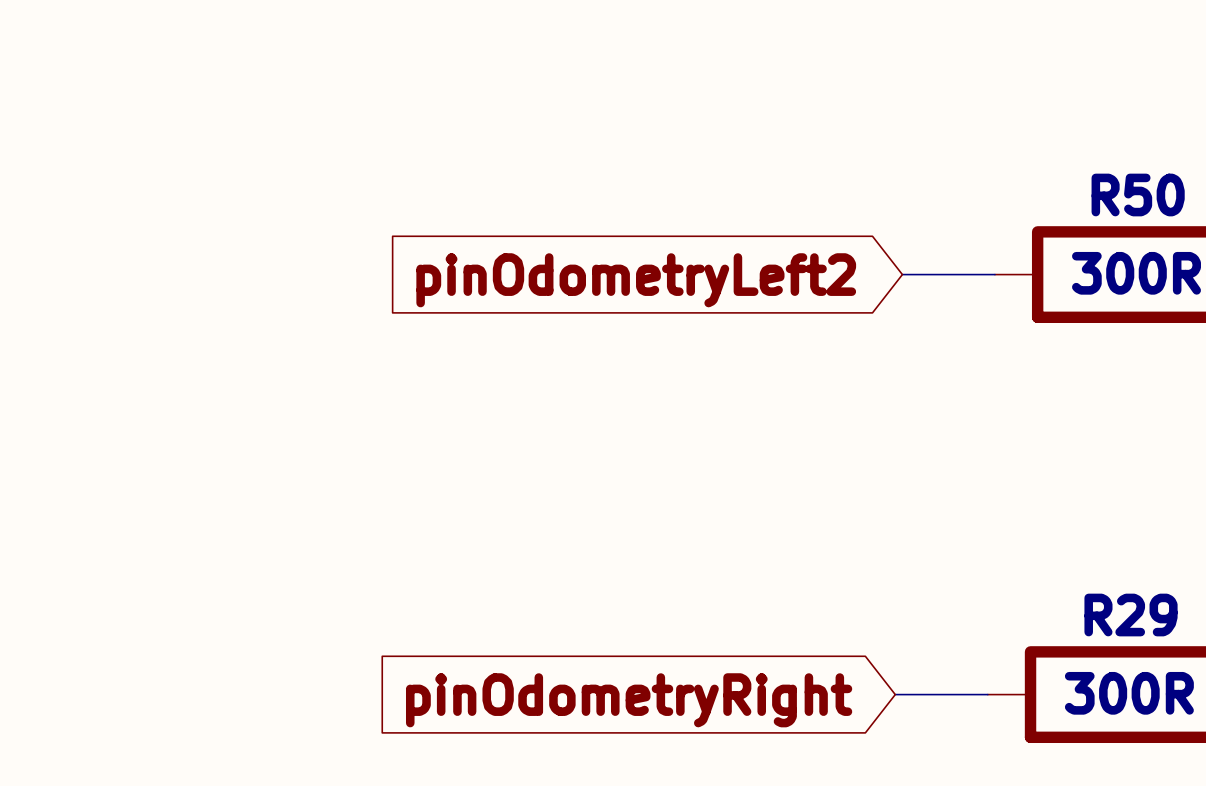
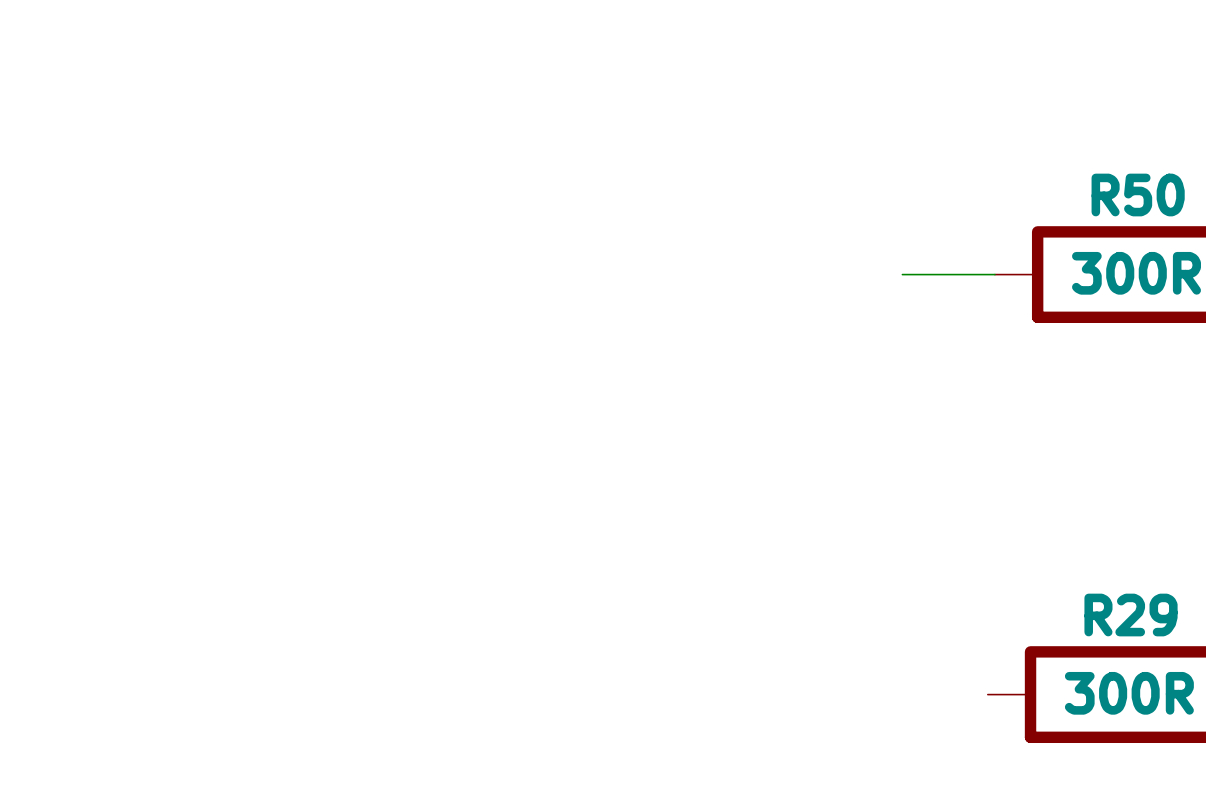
global label: pinOdometryLeft2 (636, 280) -> none
wire: (895, 694) (987, 694) -> none
global label: pinOdometryRight (629, 700) -> none

